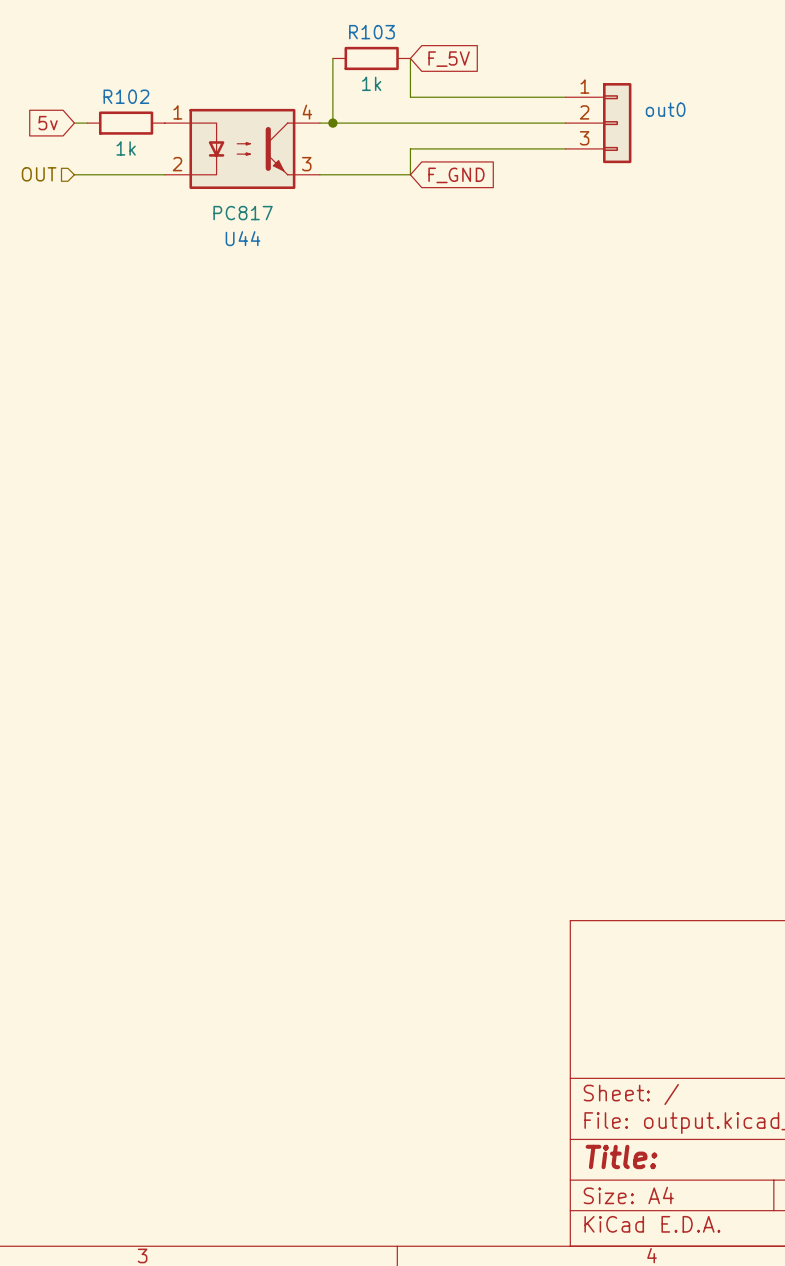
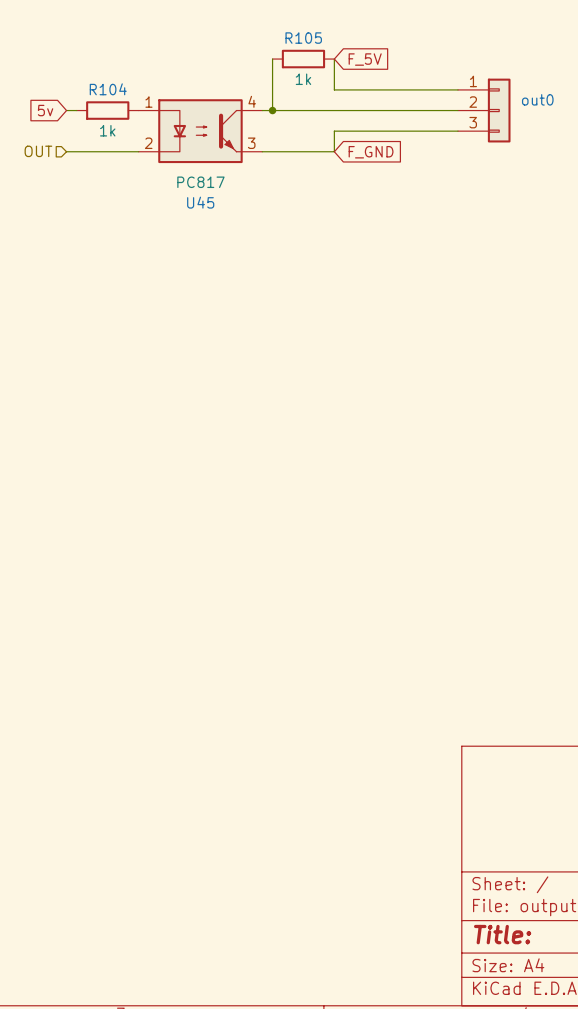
R103 name: R103 (371, 32) -> R105 (303, 38)
R102 name: R102 (126, 96) -> R104 (108, 89)
U44 name: U44 (243, 238) -> U45 (200, 202)

